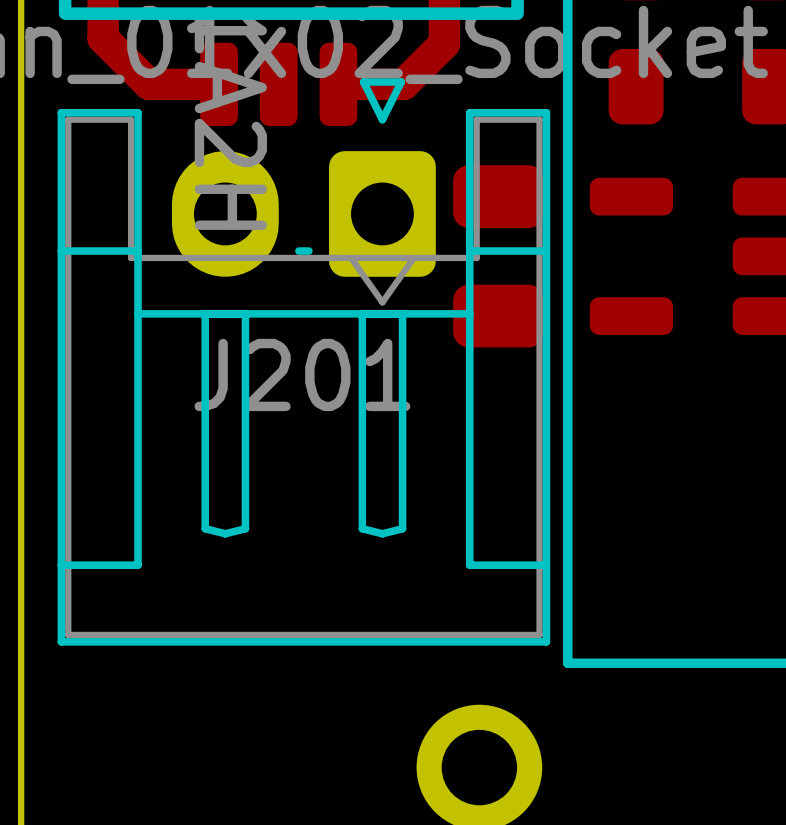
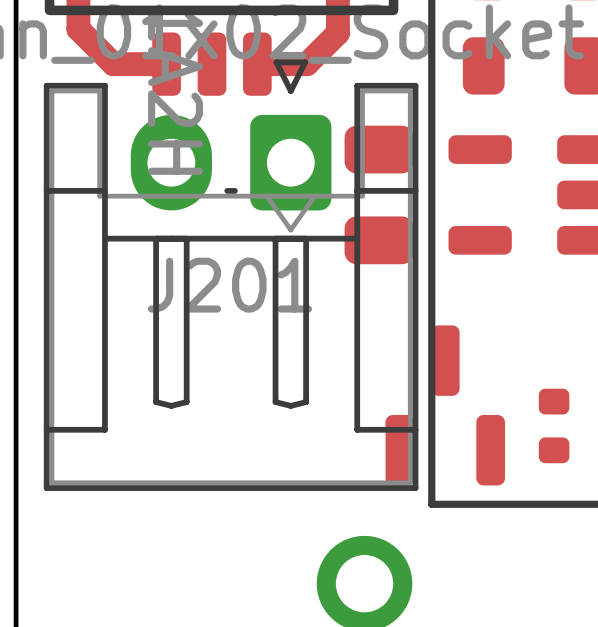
part: none -> (445, 405)
part: none -> (554, 425)

